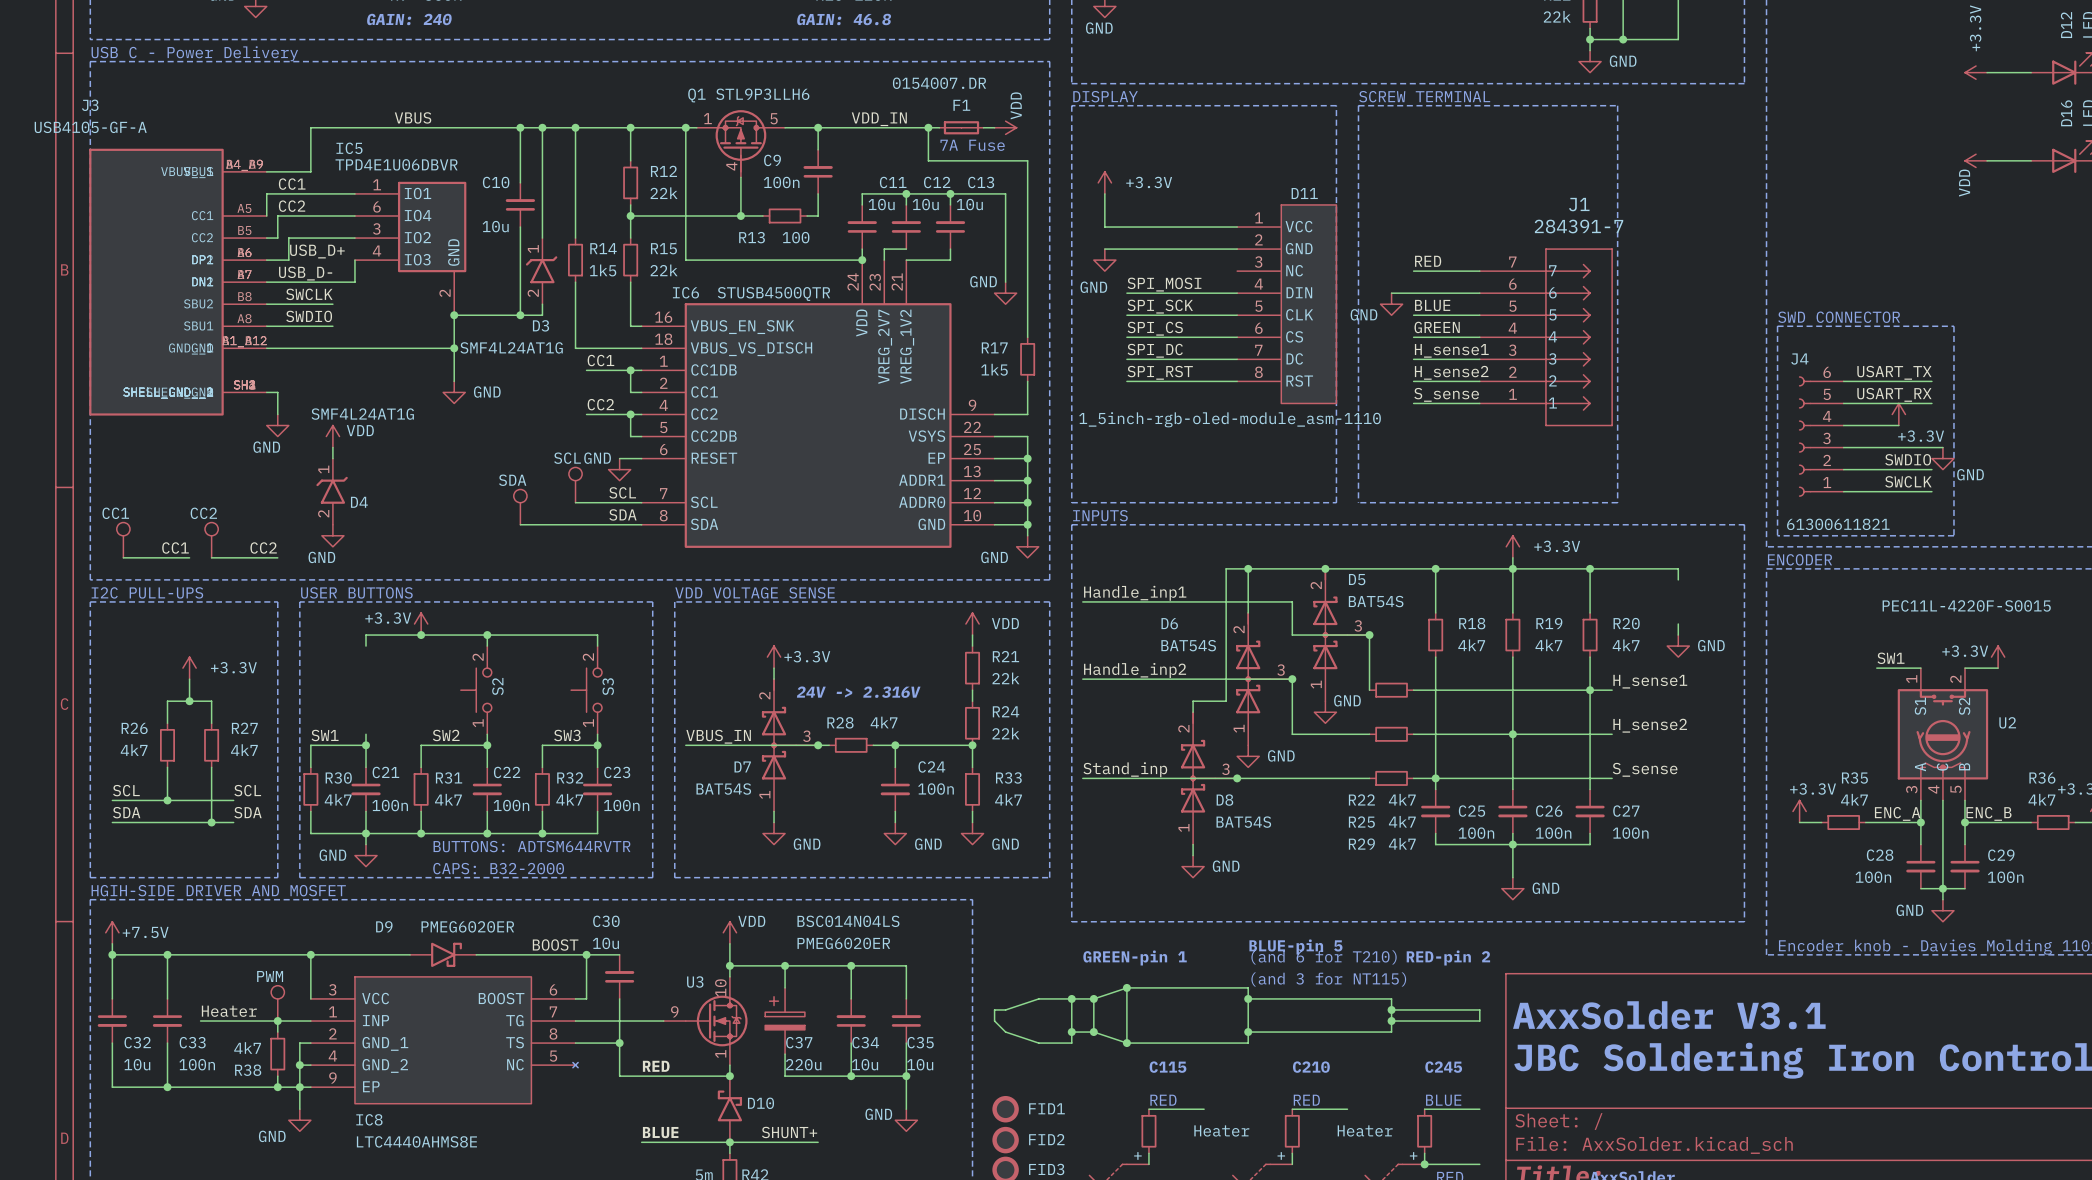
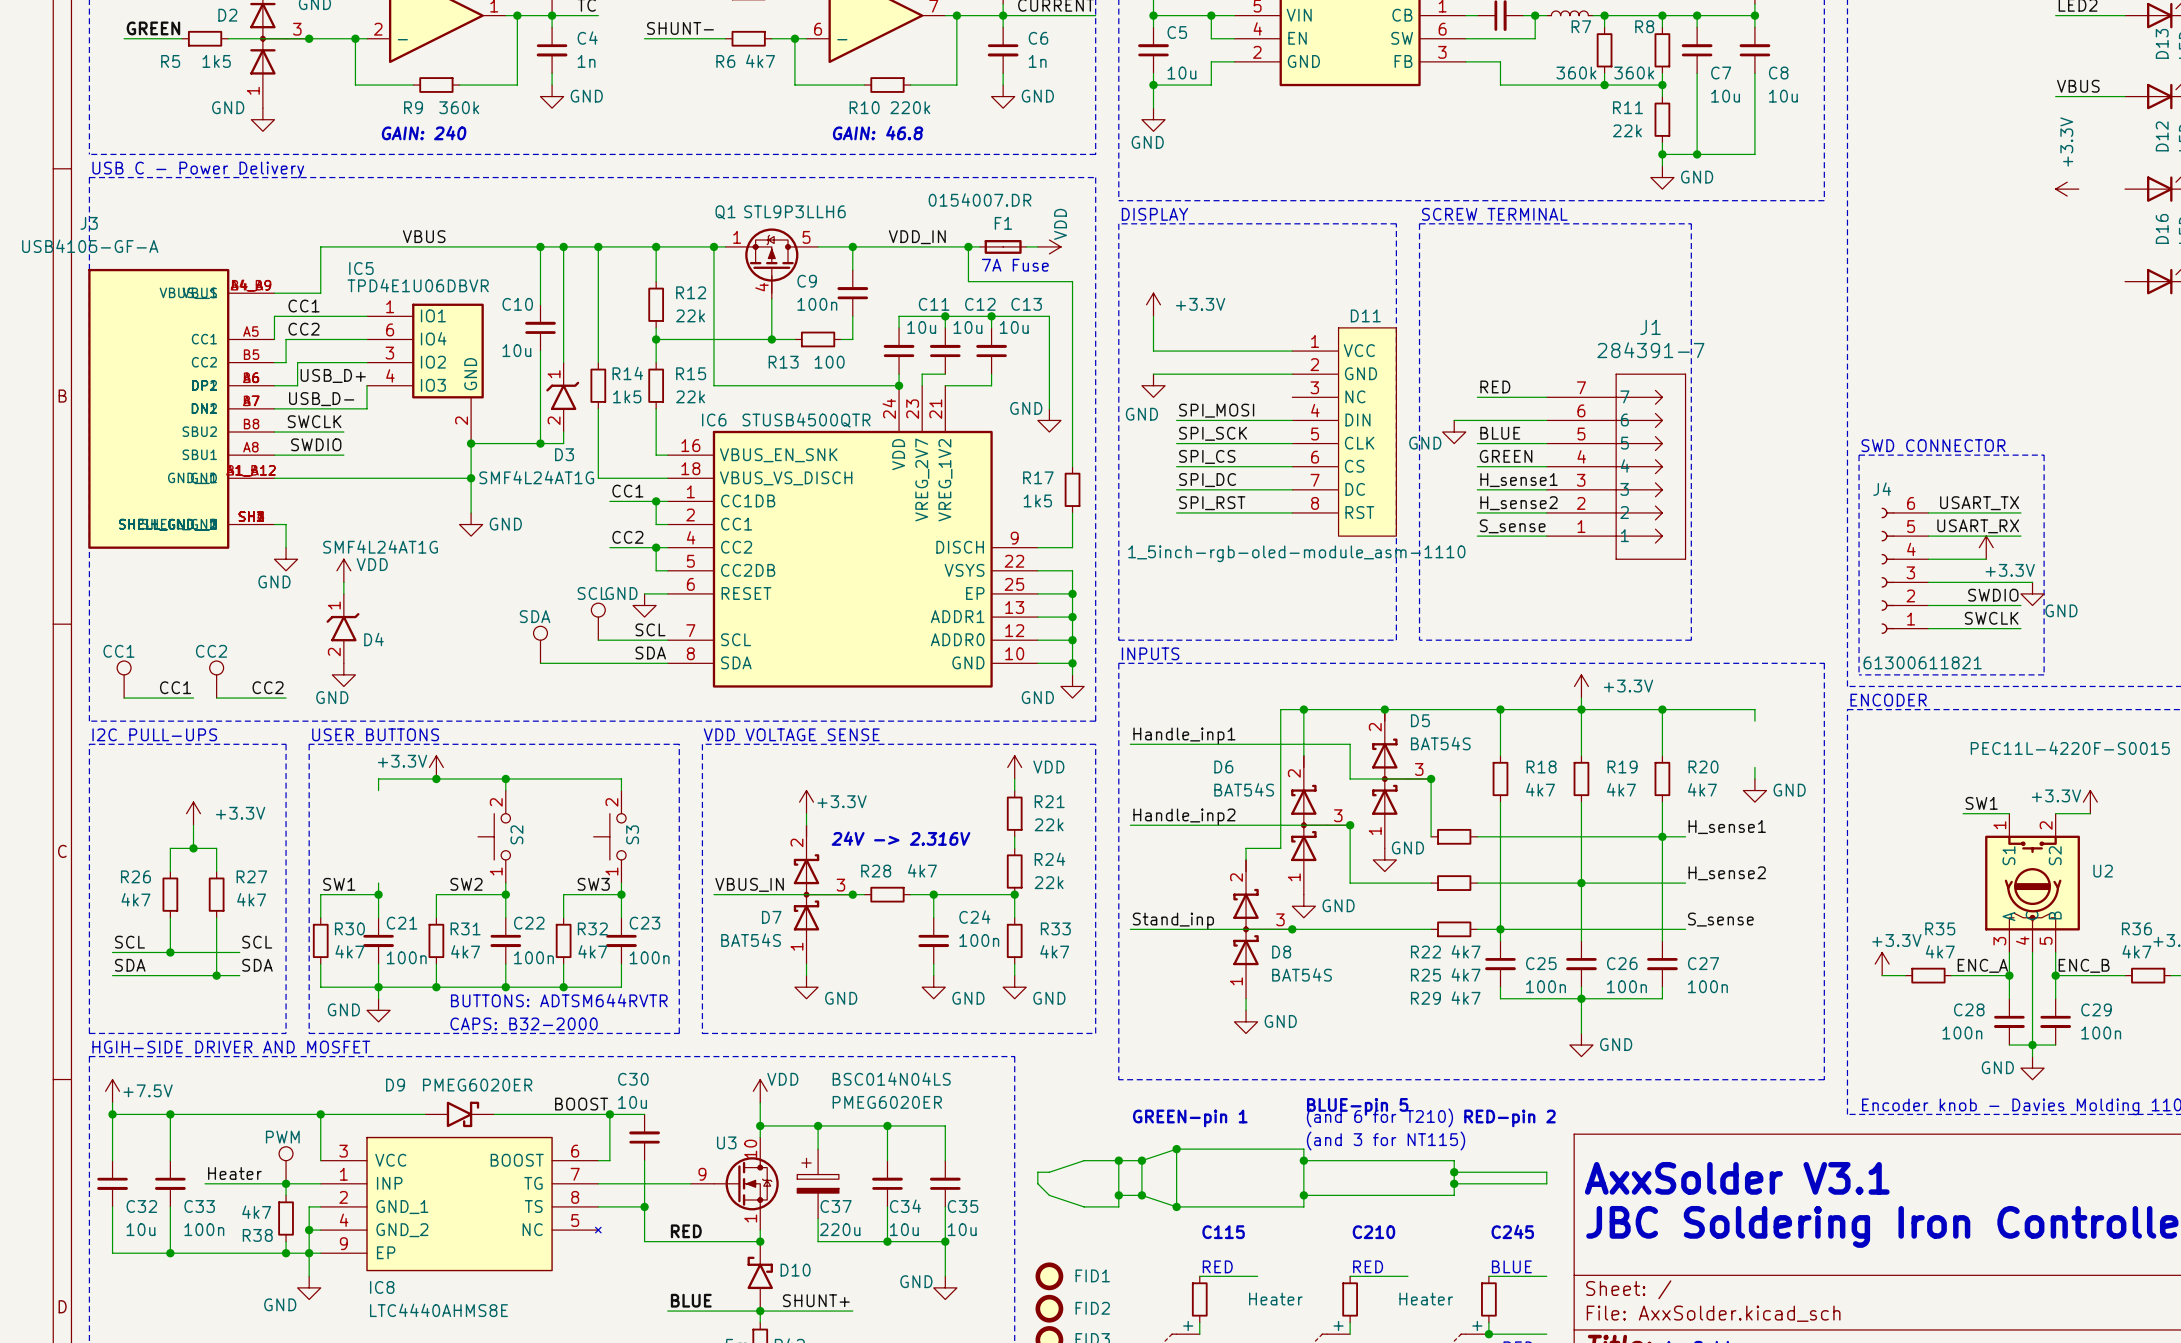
wire: (1987, 72) (2031, 72) -> none
power symbol: VDD (1976, 160) -> none
wire: (1987, 160) (2031, 160) -> none

